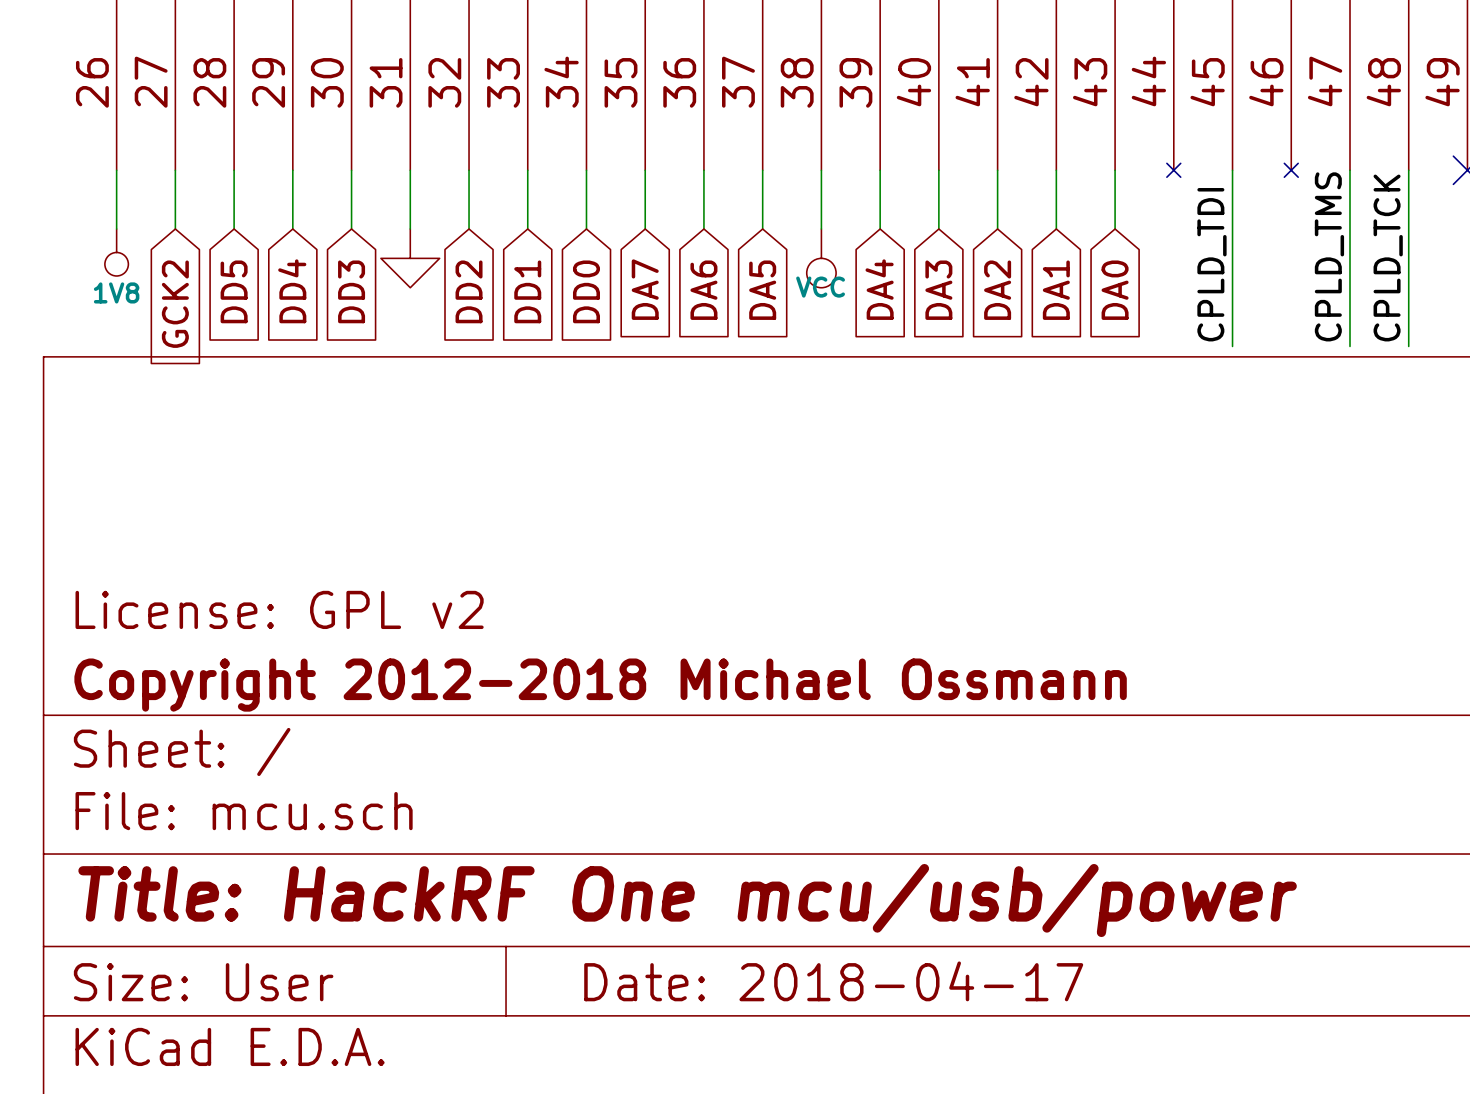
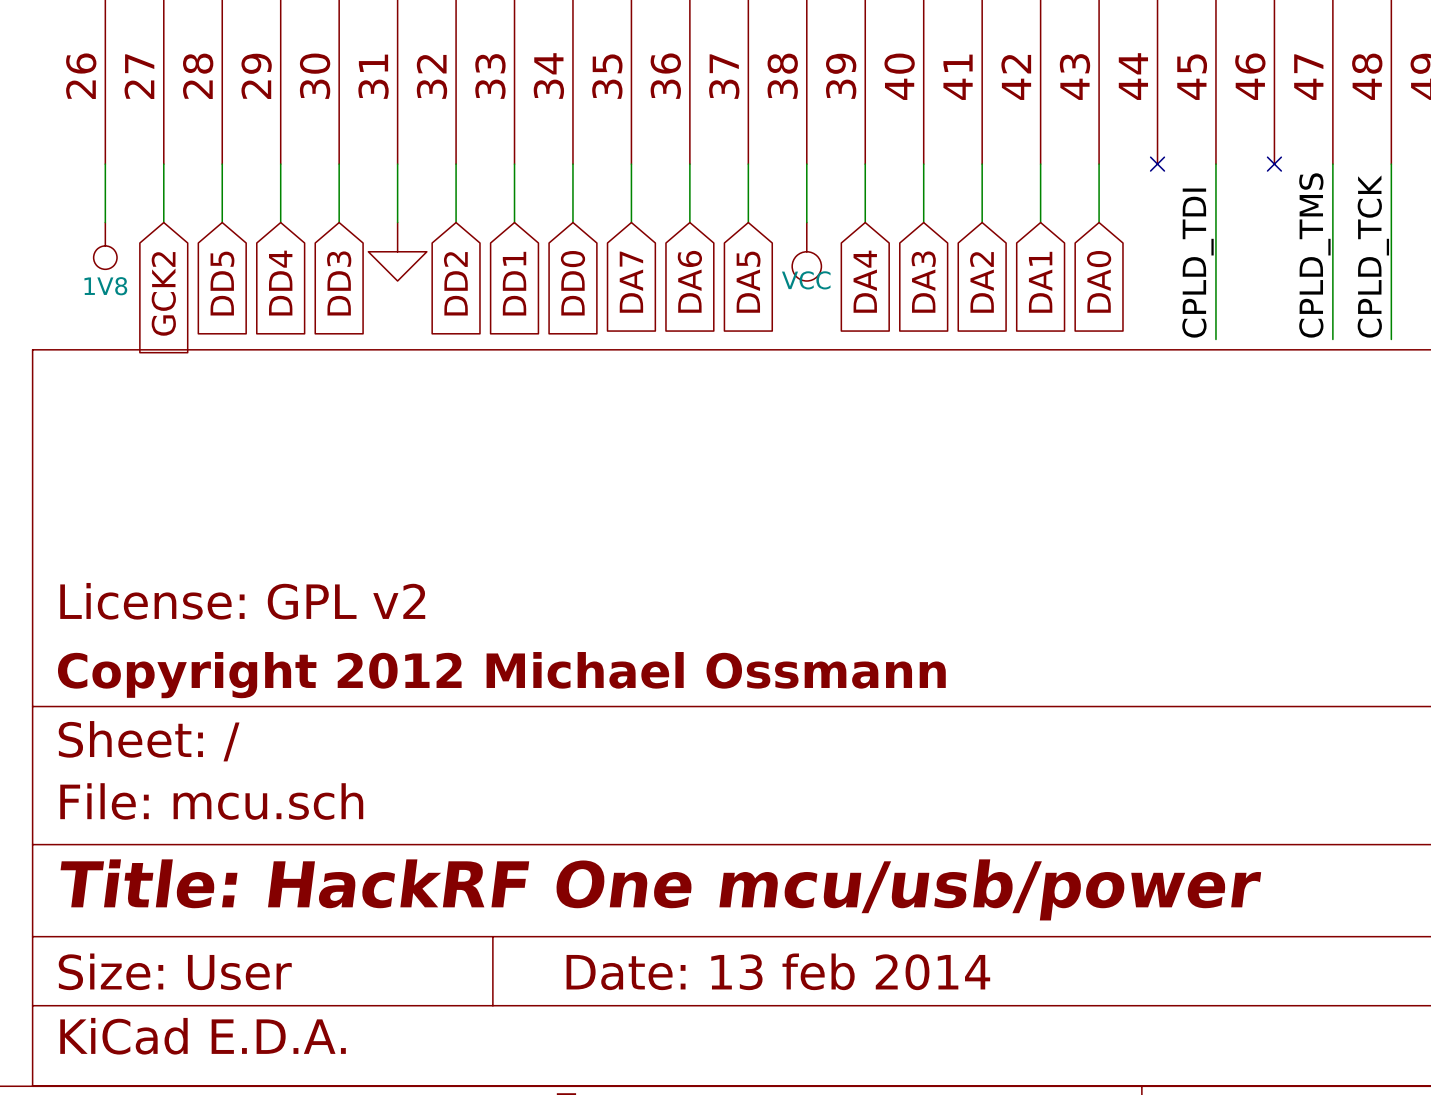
title block: Copyright 2012-2018 Michael Ossmann (600, 685) -> Copyright 2012 Michael Ossmann (501, 675)
title block: Date: 2018-04-17 (833, 981) -> Date: 13 feb 2014 (778, 971)

